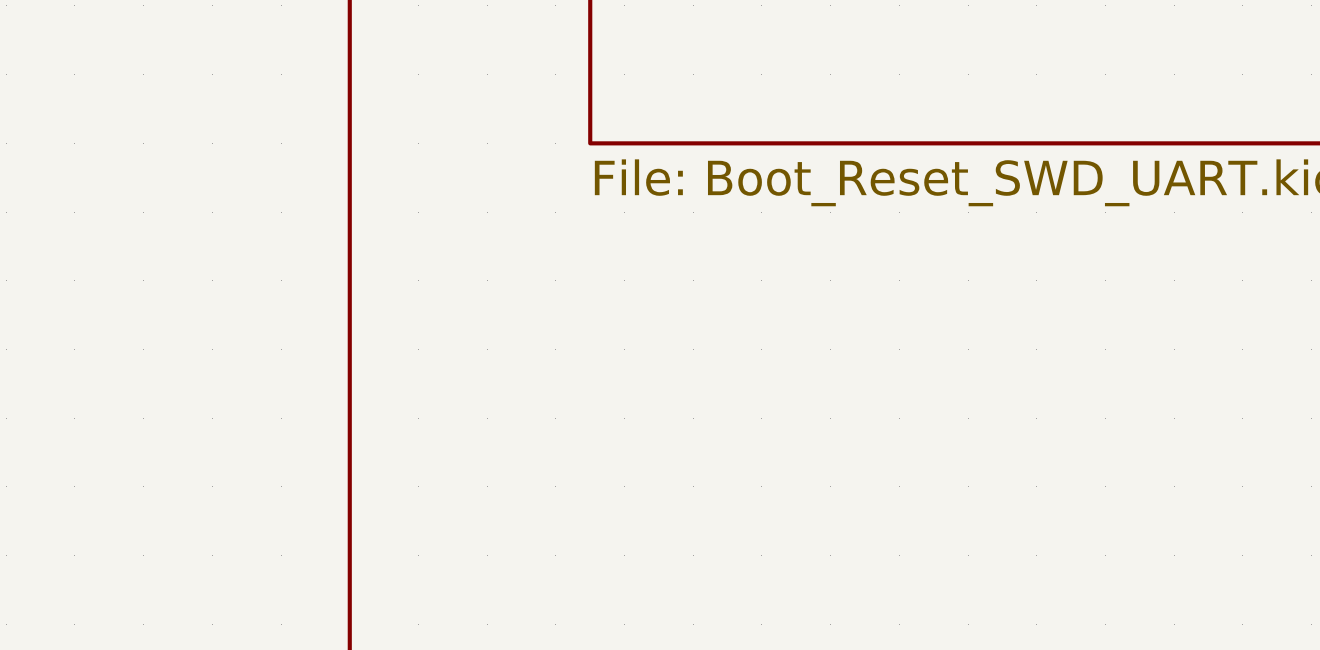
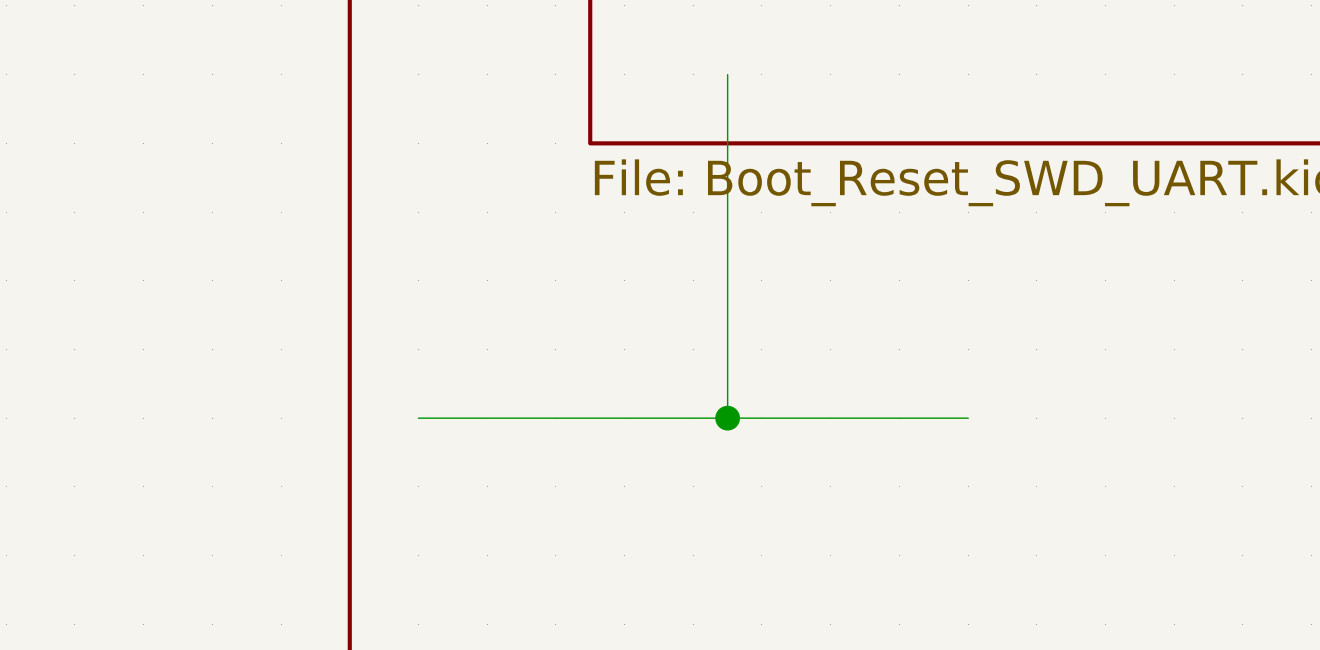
wire: none -> (727, 74) (727, 418)
wire: none -> (418, 418) (968, 418)
junction: none -> (727, 418)

